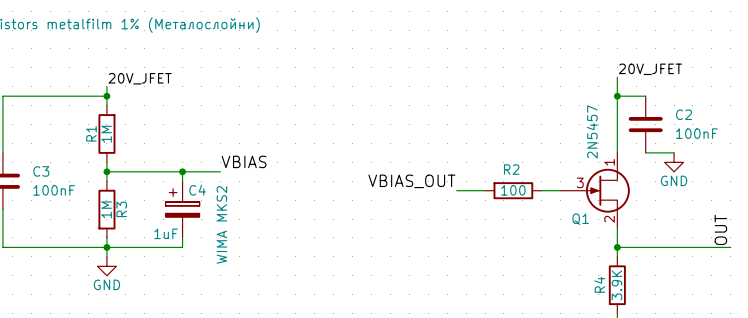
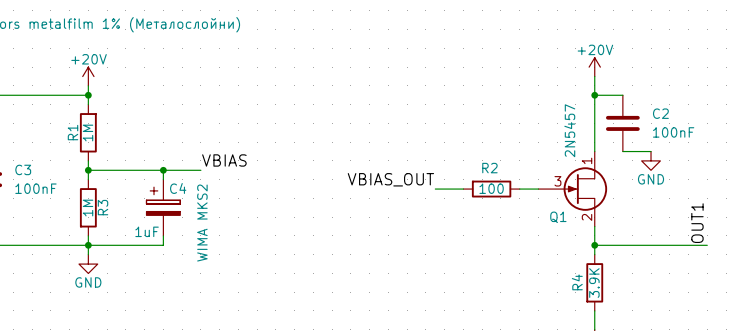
power symbol: none -> +20V (594, 67)
label: 20V_JFET (650, 69) -> none
power symbol: none -> +20V (88, 76)
label: 20V_JFET (140, 78) -> none
label: OUT (720, 229) -> OUT1 (697, 223)

